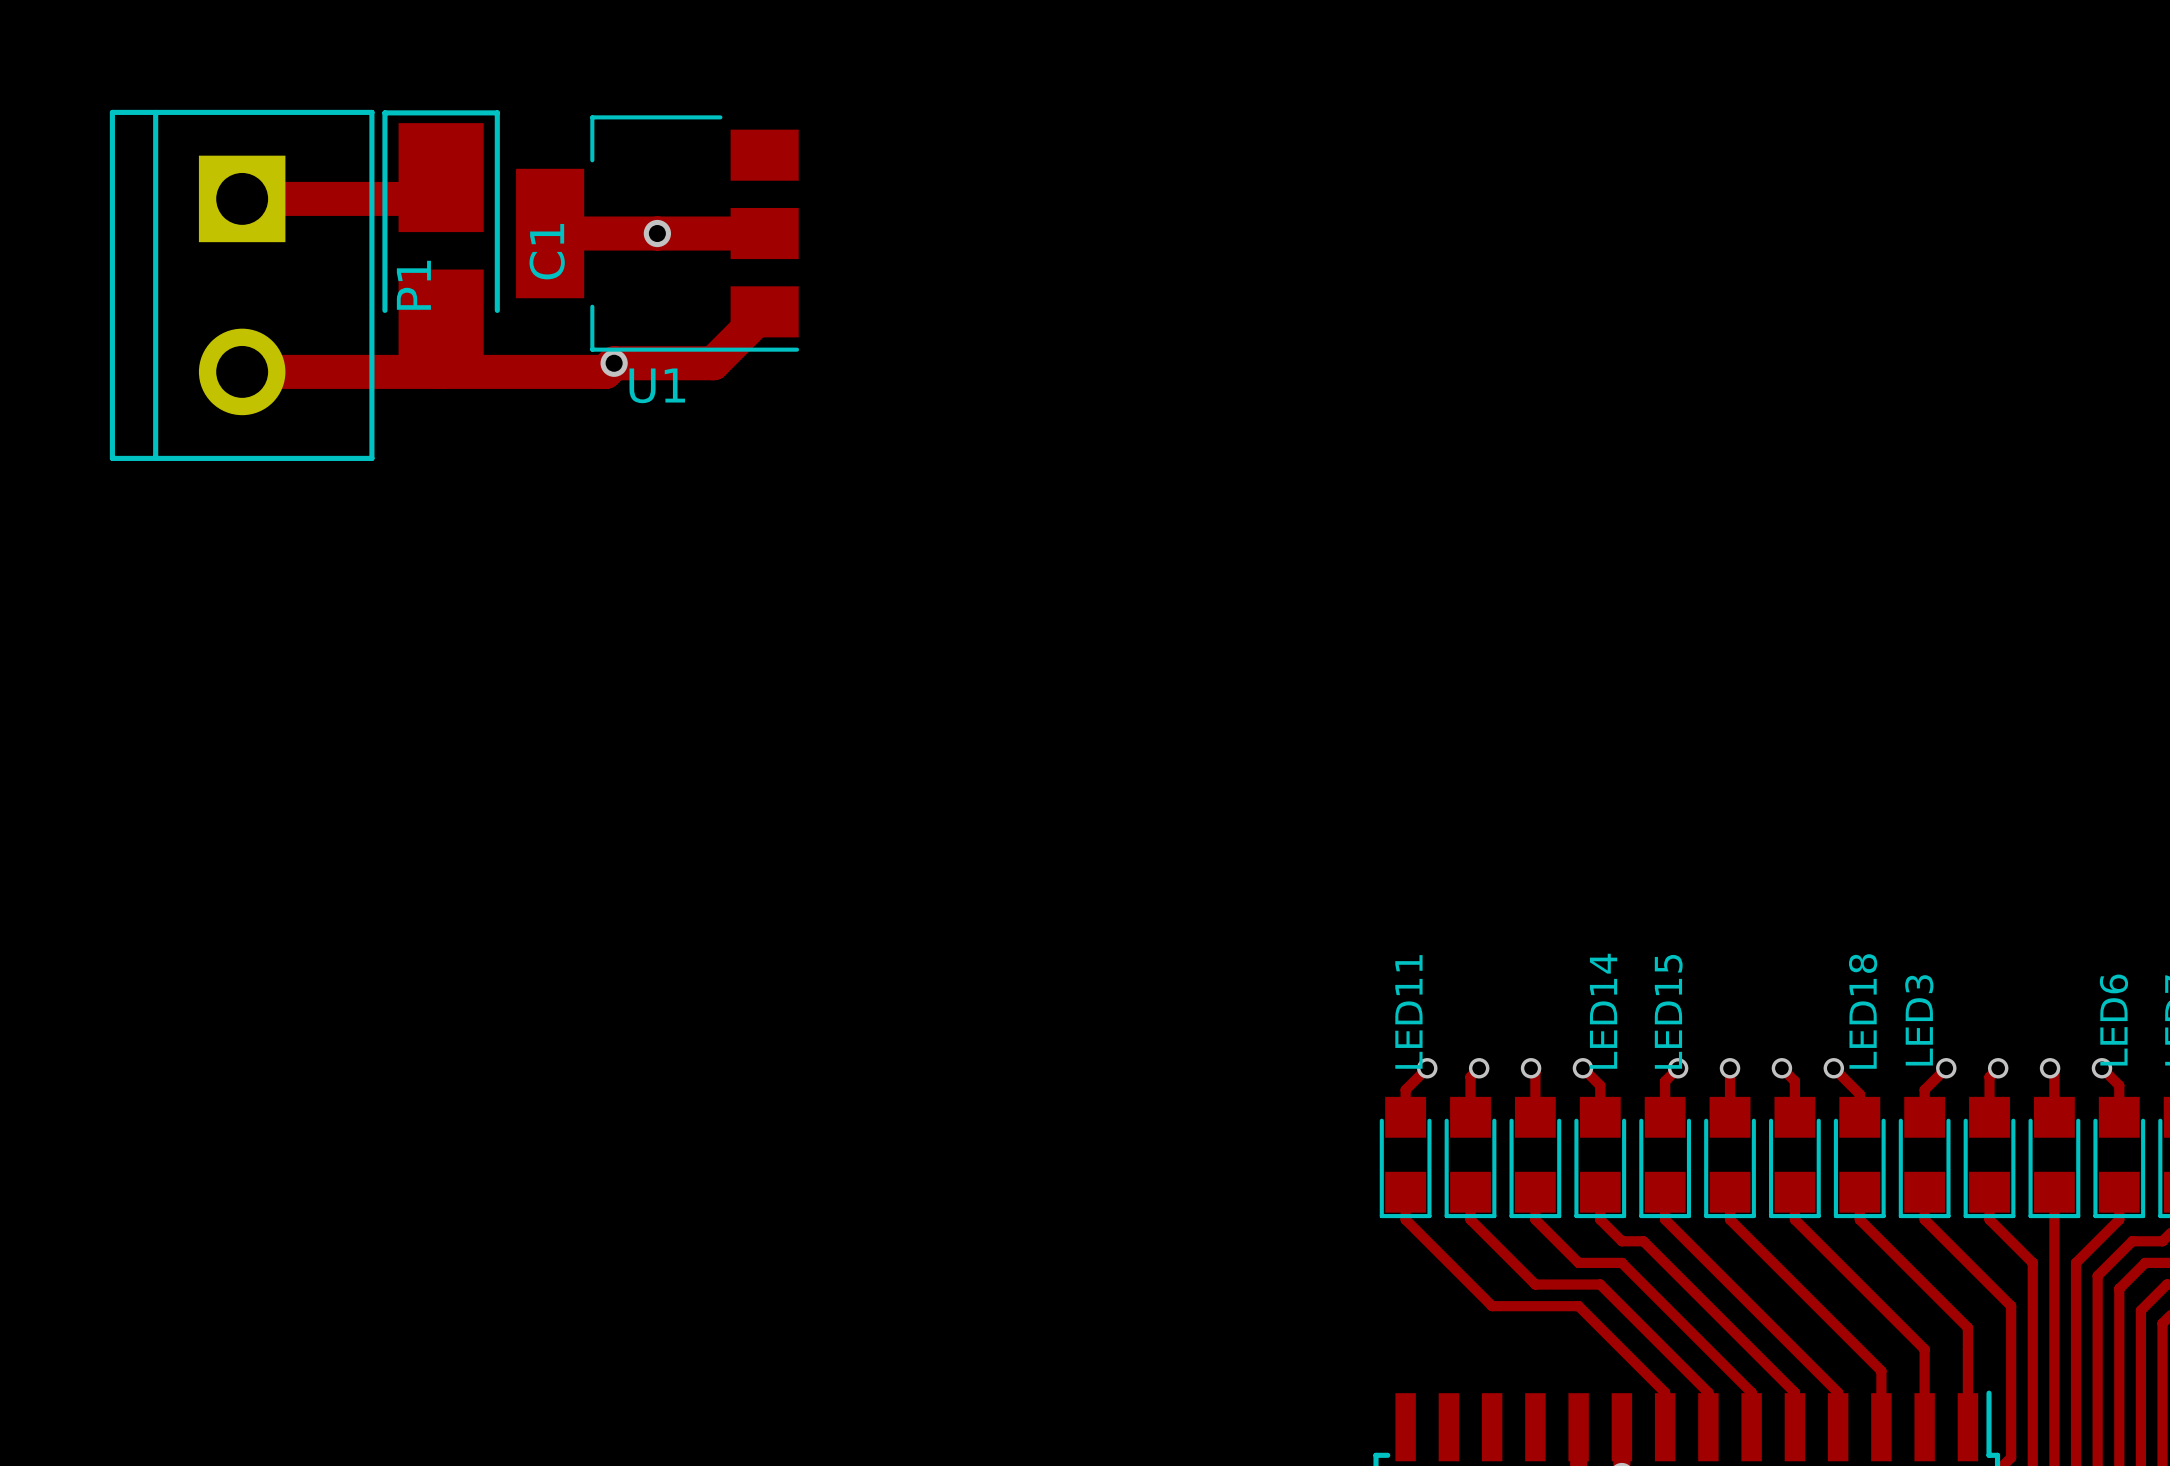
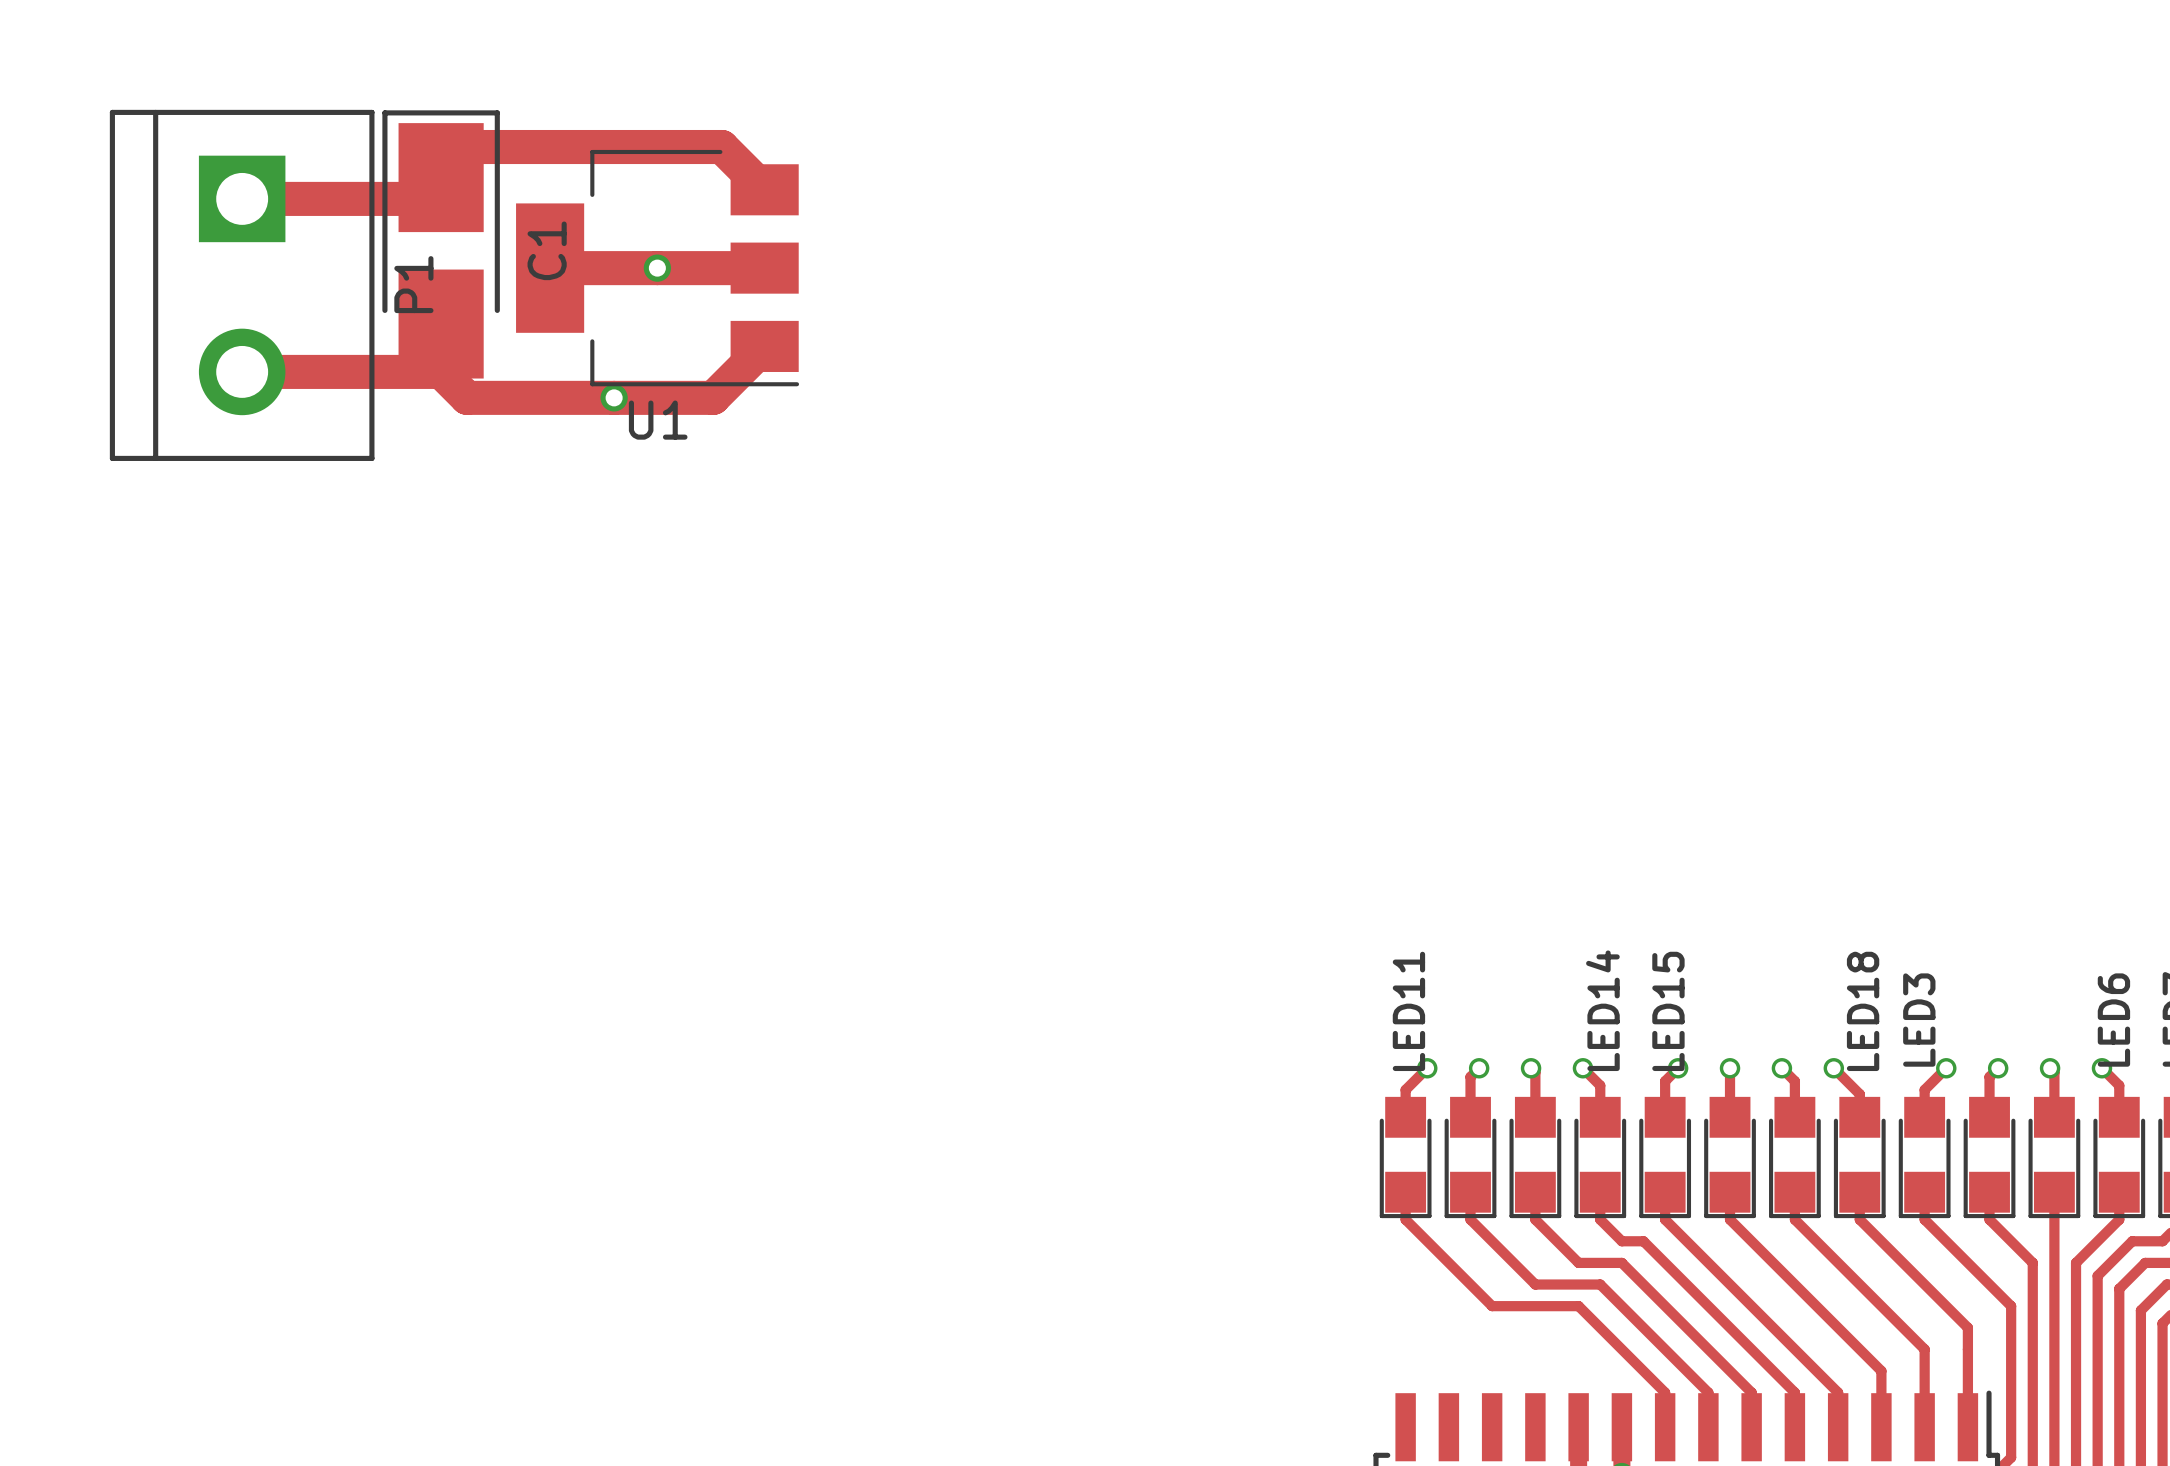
track: none -> (441, 177) (471, 147) (721, 147) (764, 189)
track: (550, 233) (764, 233) -> (550, 268) (764, 268)
U1 position: (657, 233) -> (657, 268)
via position: (657, 233) -> (657, 268)
track: (764, 311) (713, 363) (614, 363) (605, 371) (441, 371) -> (764, 346) (713, 397) (467, 397) (441, 371)
via position: (614, 363) -> (614, 397)

